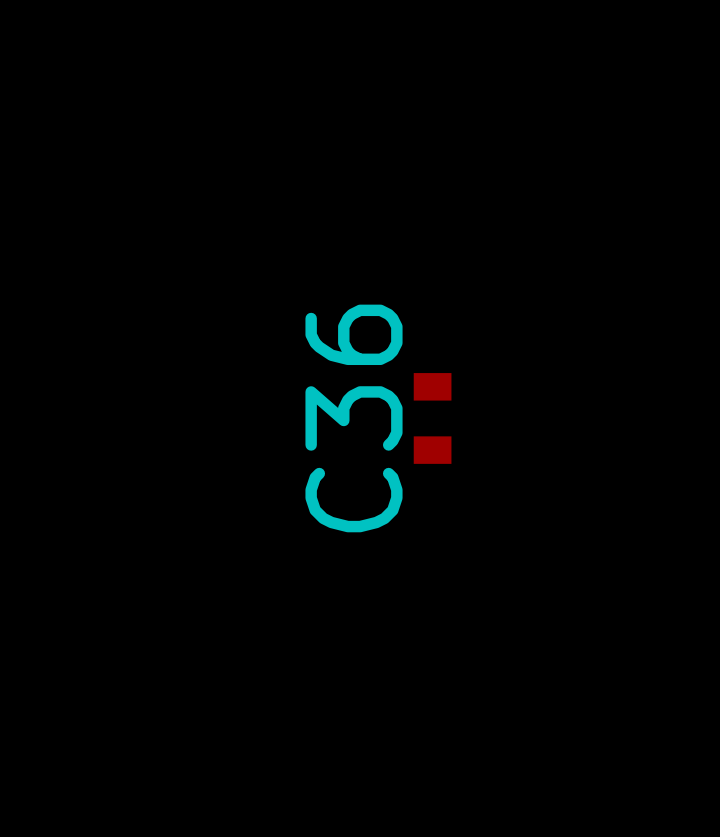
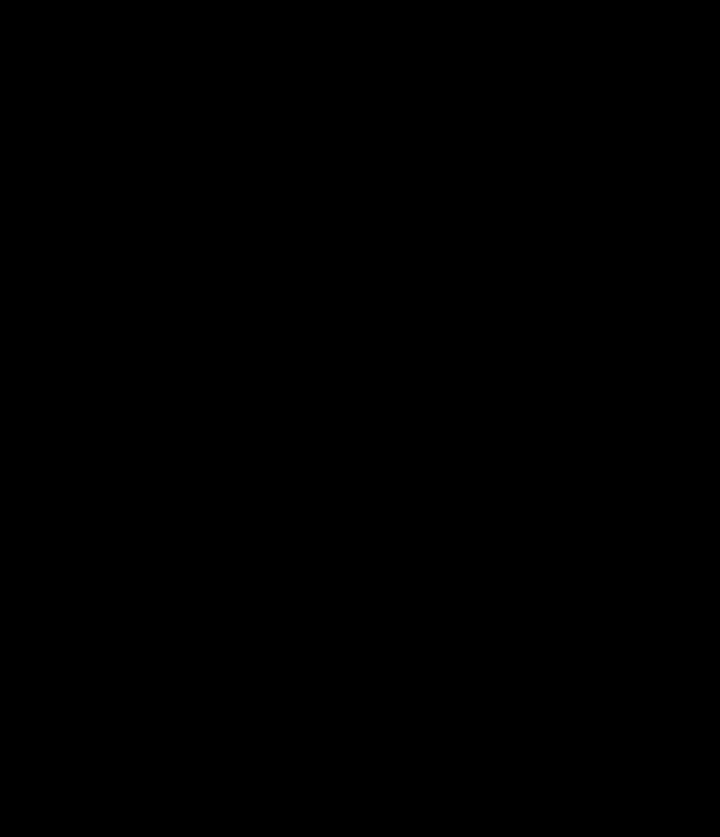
C36: (432, 418) -> none

